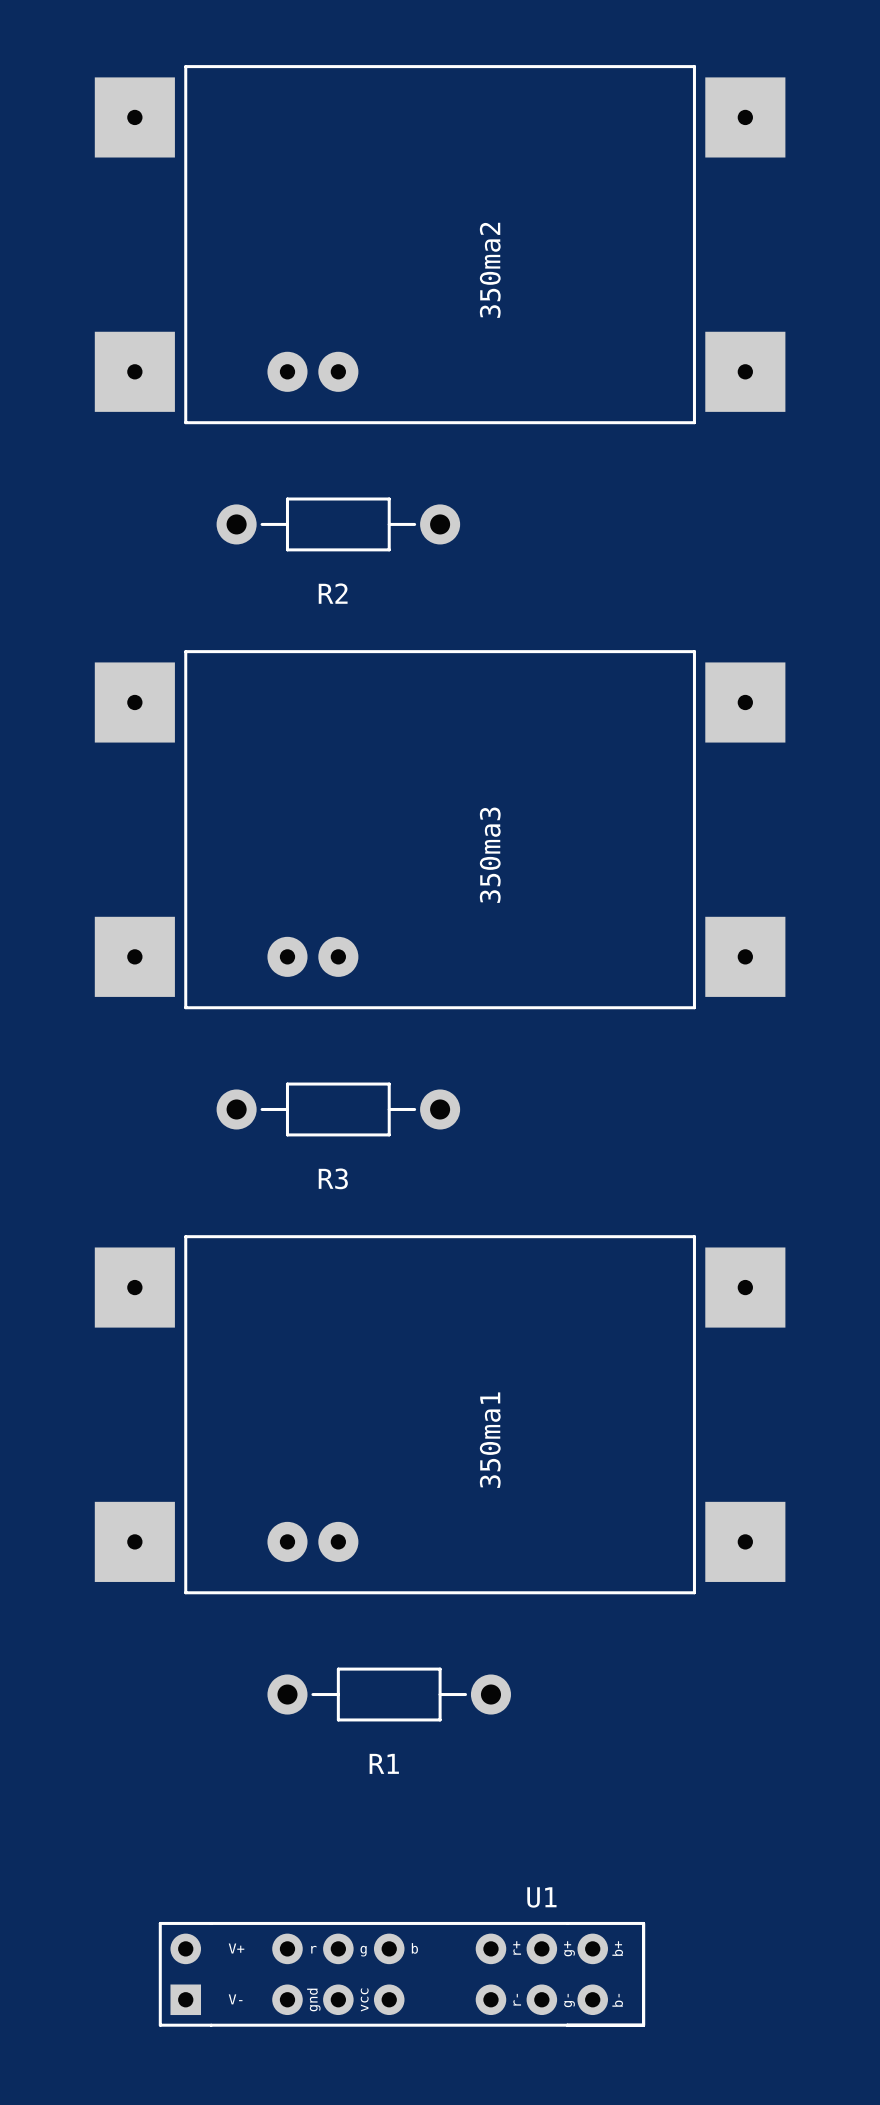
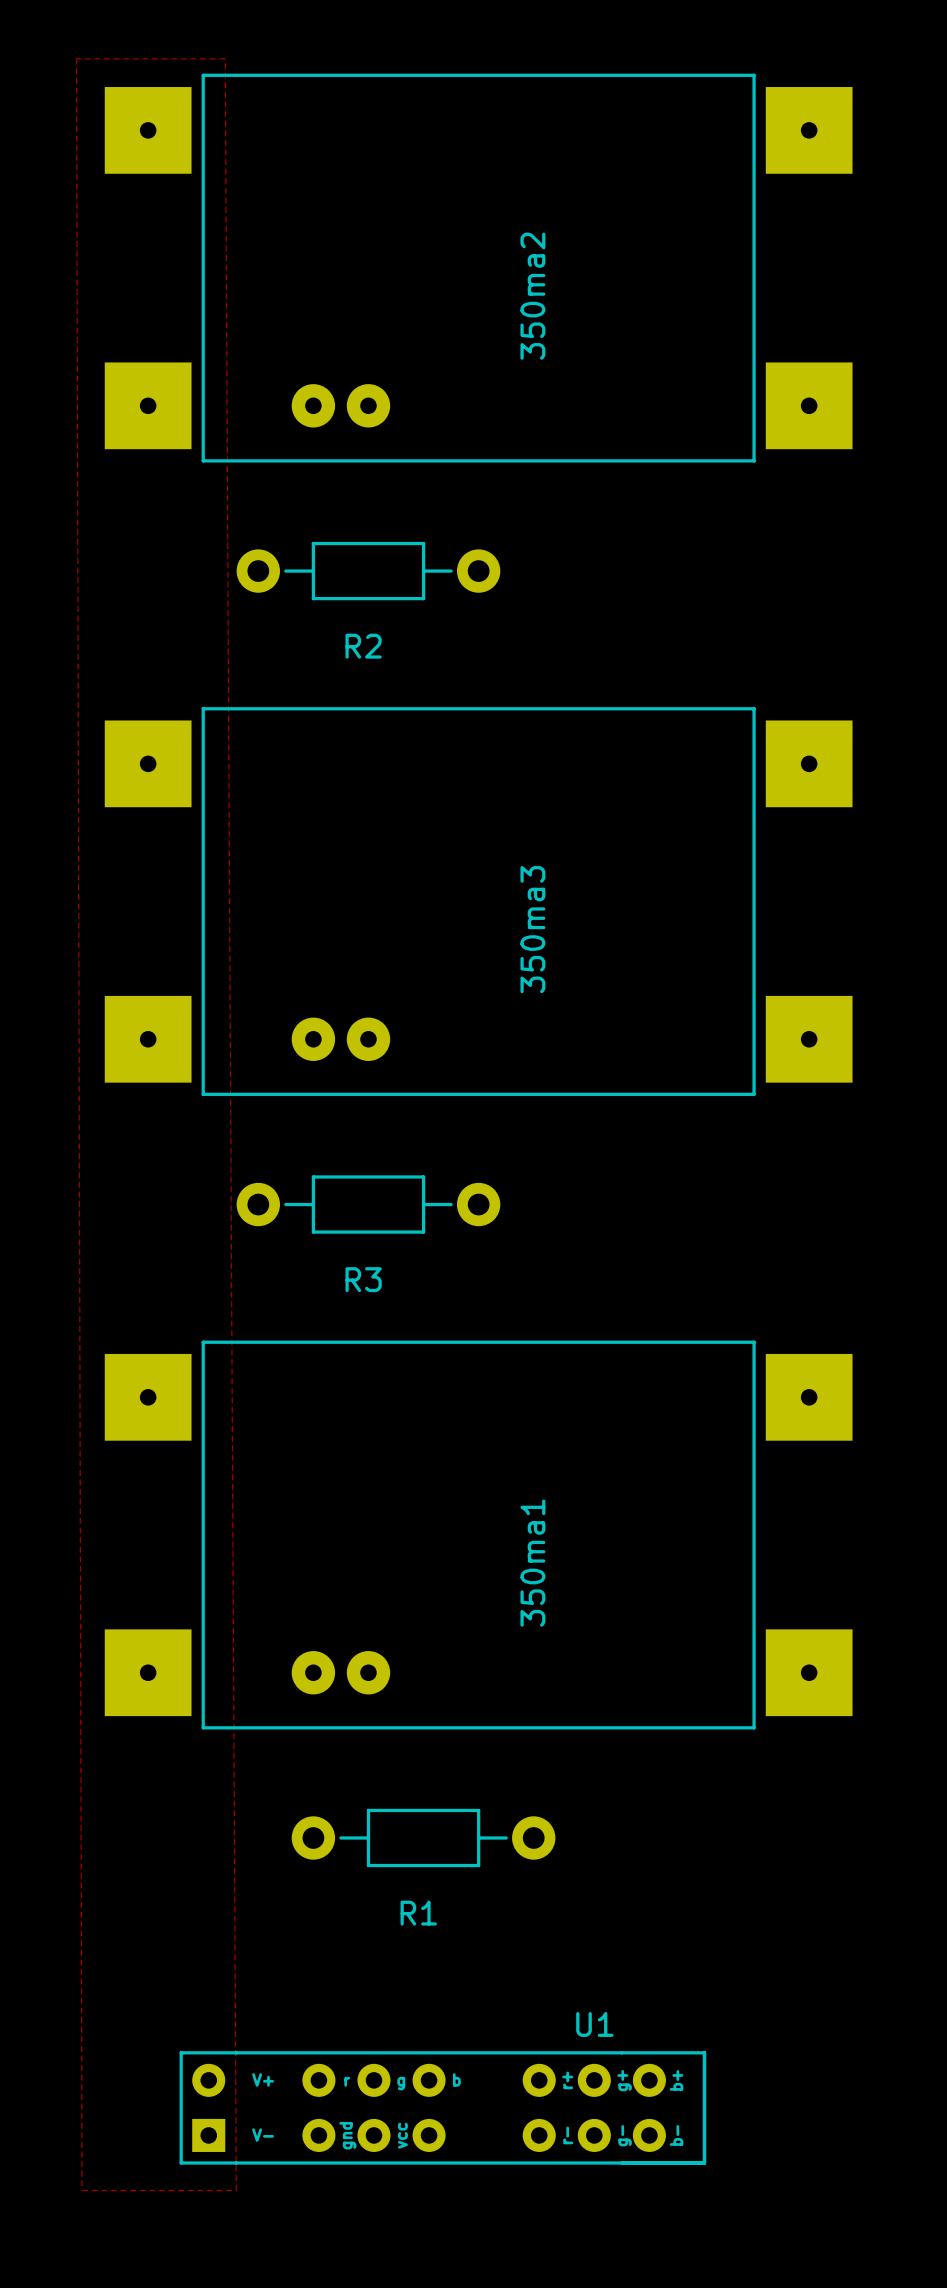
zone outline: none -> (76, 58) (225, 58) (236, 2190) (82, 2190) (76, 58)
U1 position: (401, 1974) -> (442, 2107)

